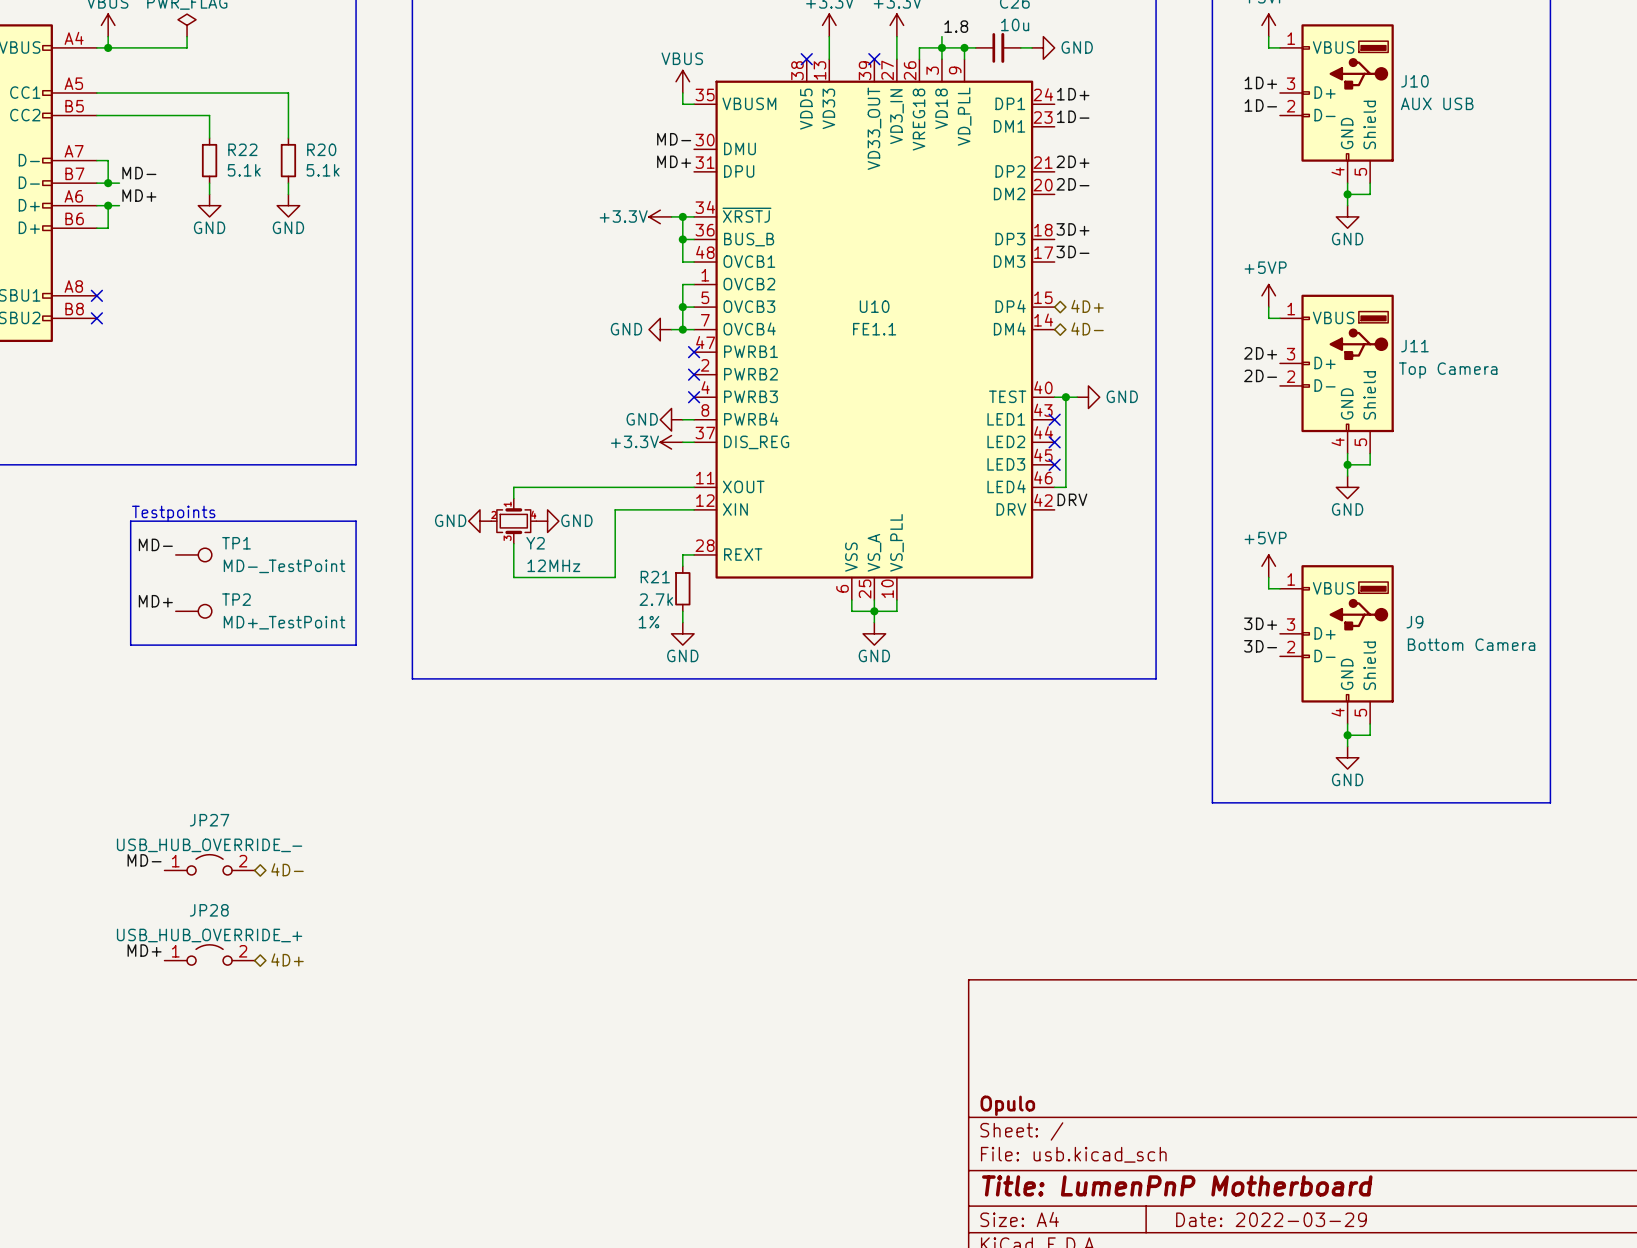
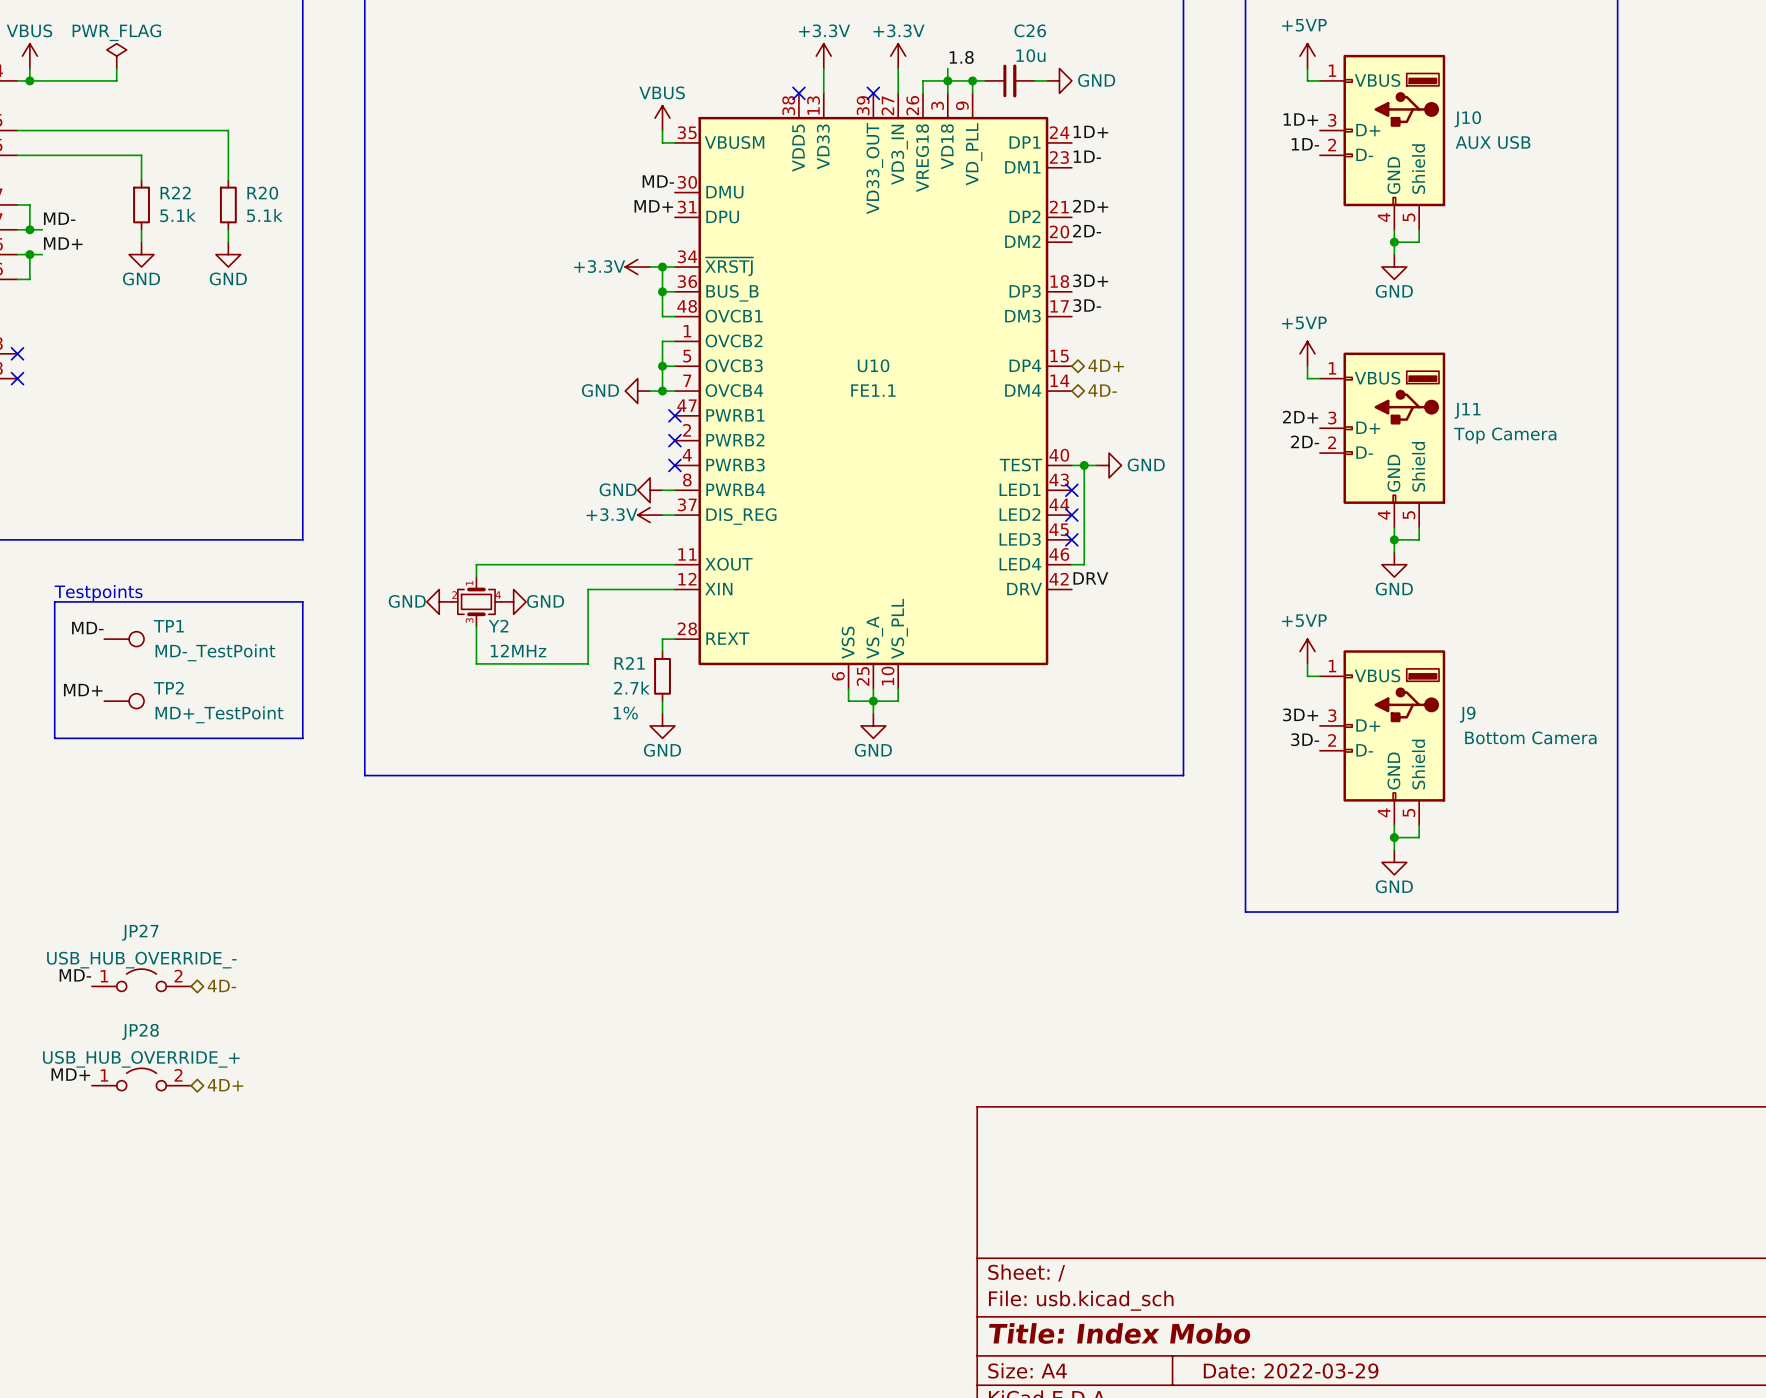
title block: Opulo (1007, 1105) -> none
title block: Title: LumenPnP Motherboard (1177, 1185) -> Title: Index Mobo (1119, 1333)

